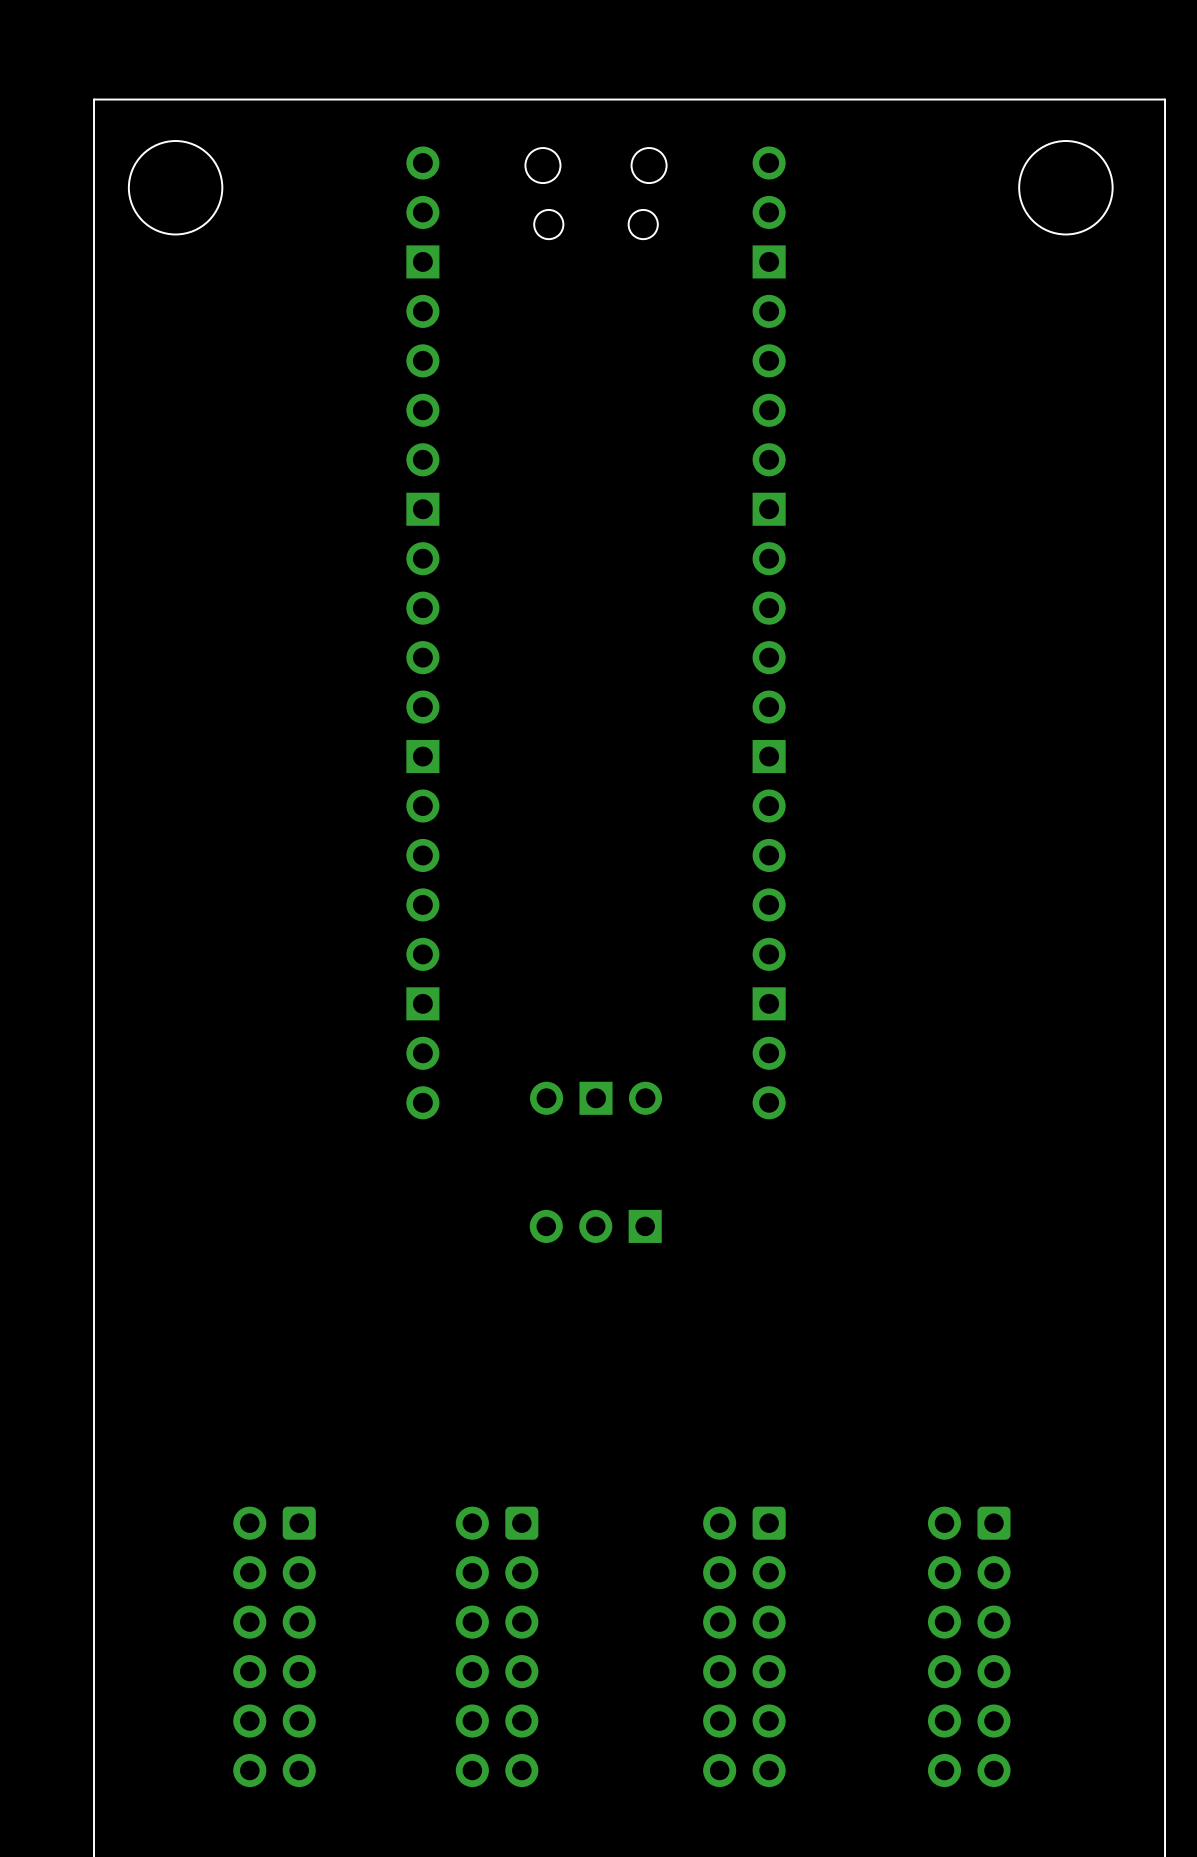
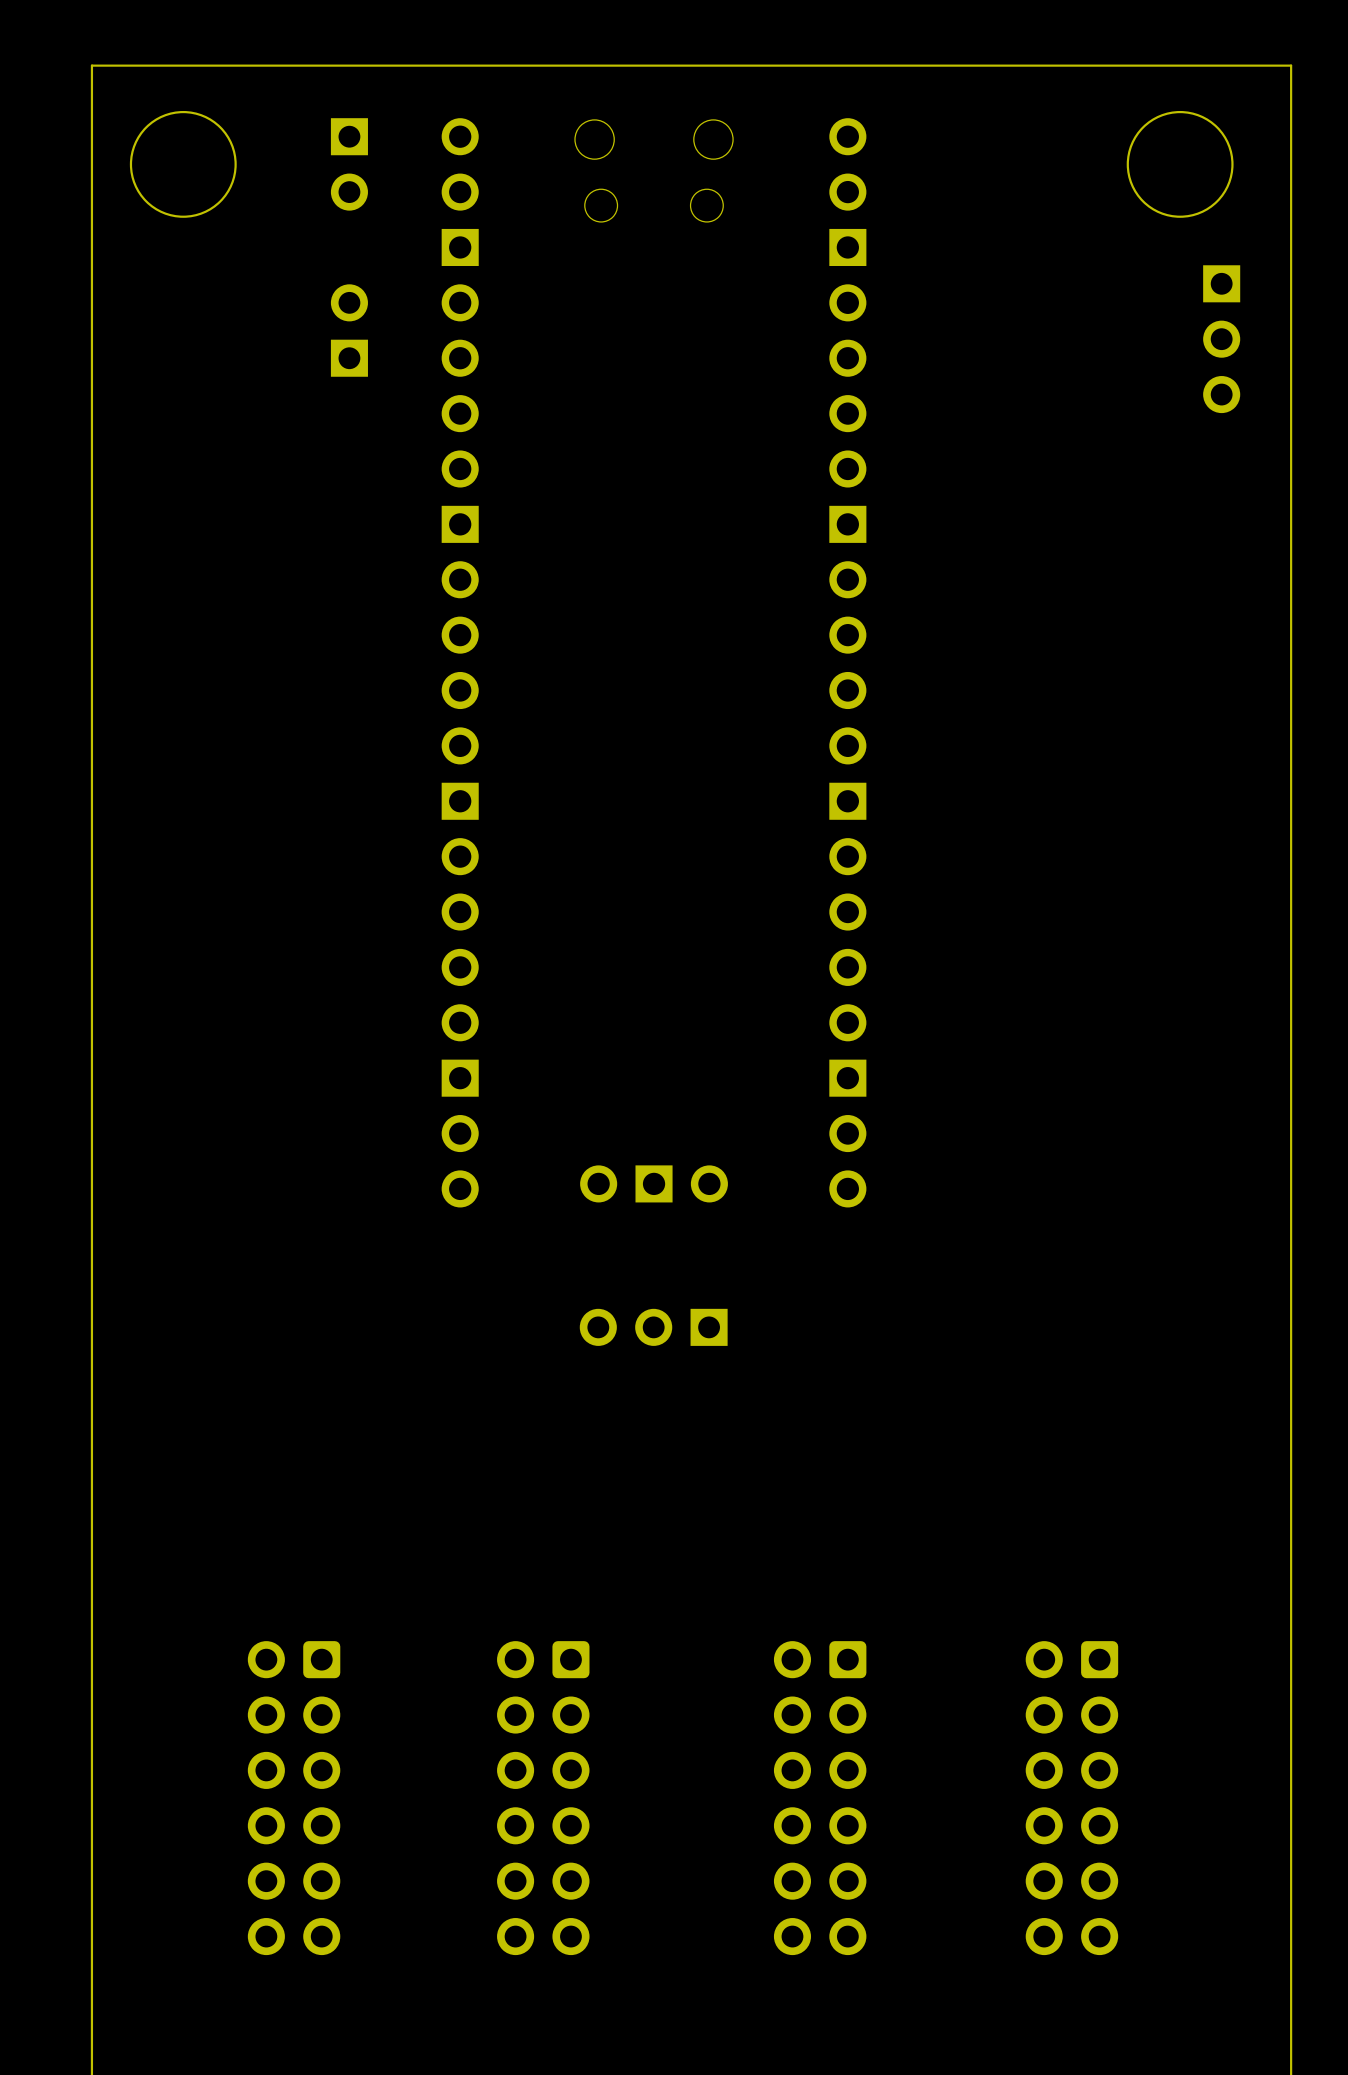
part: none -> (349, 164)
part: none -> (349, 330)
part: none -> (1221, 339)

